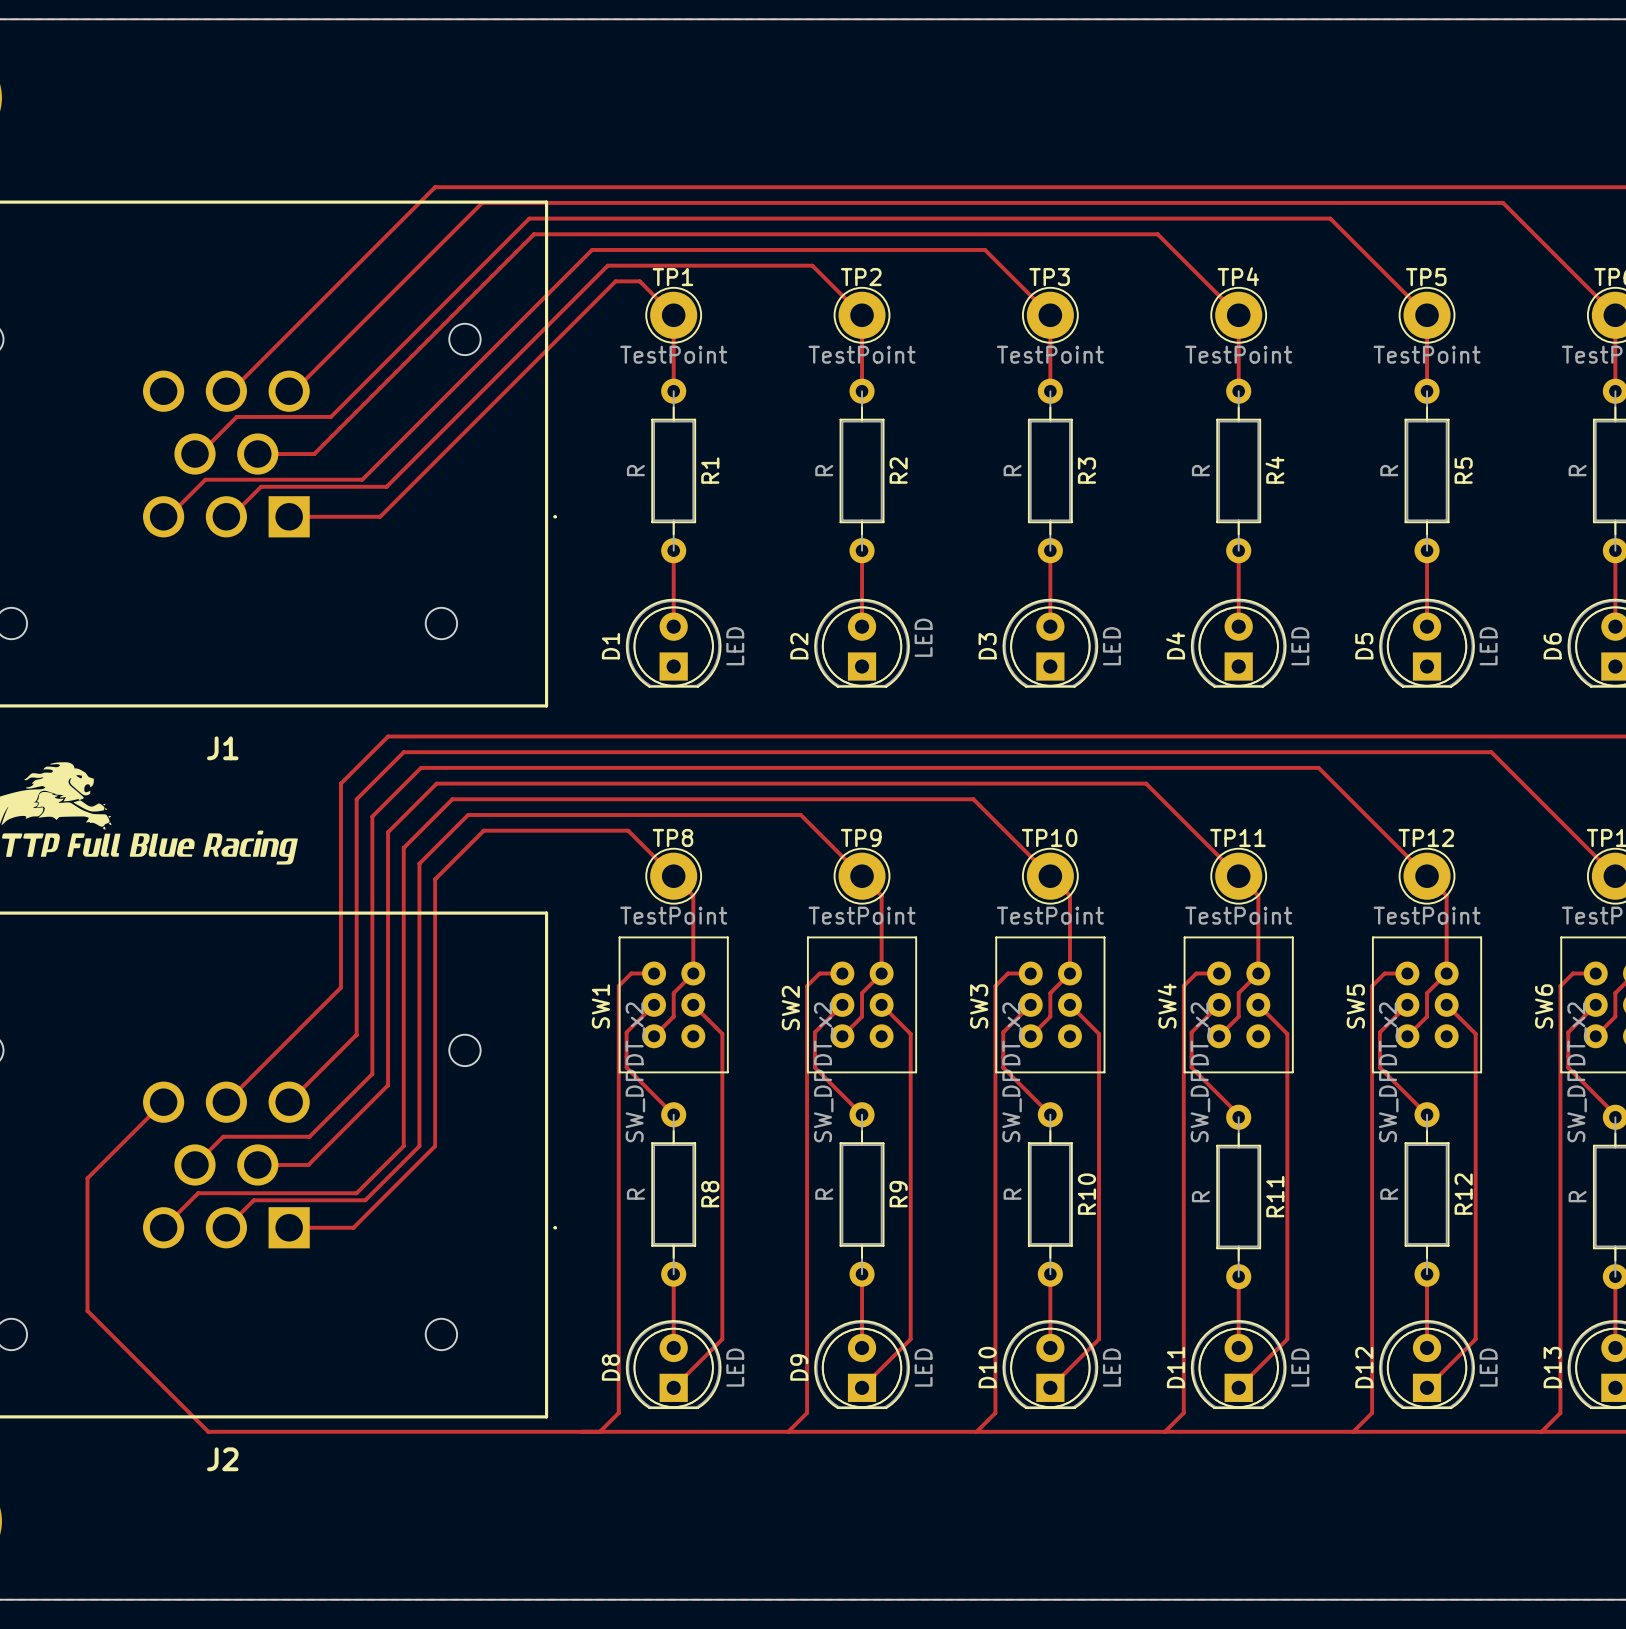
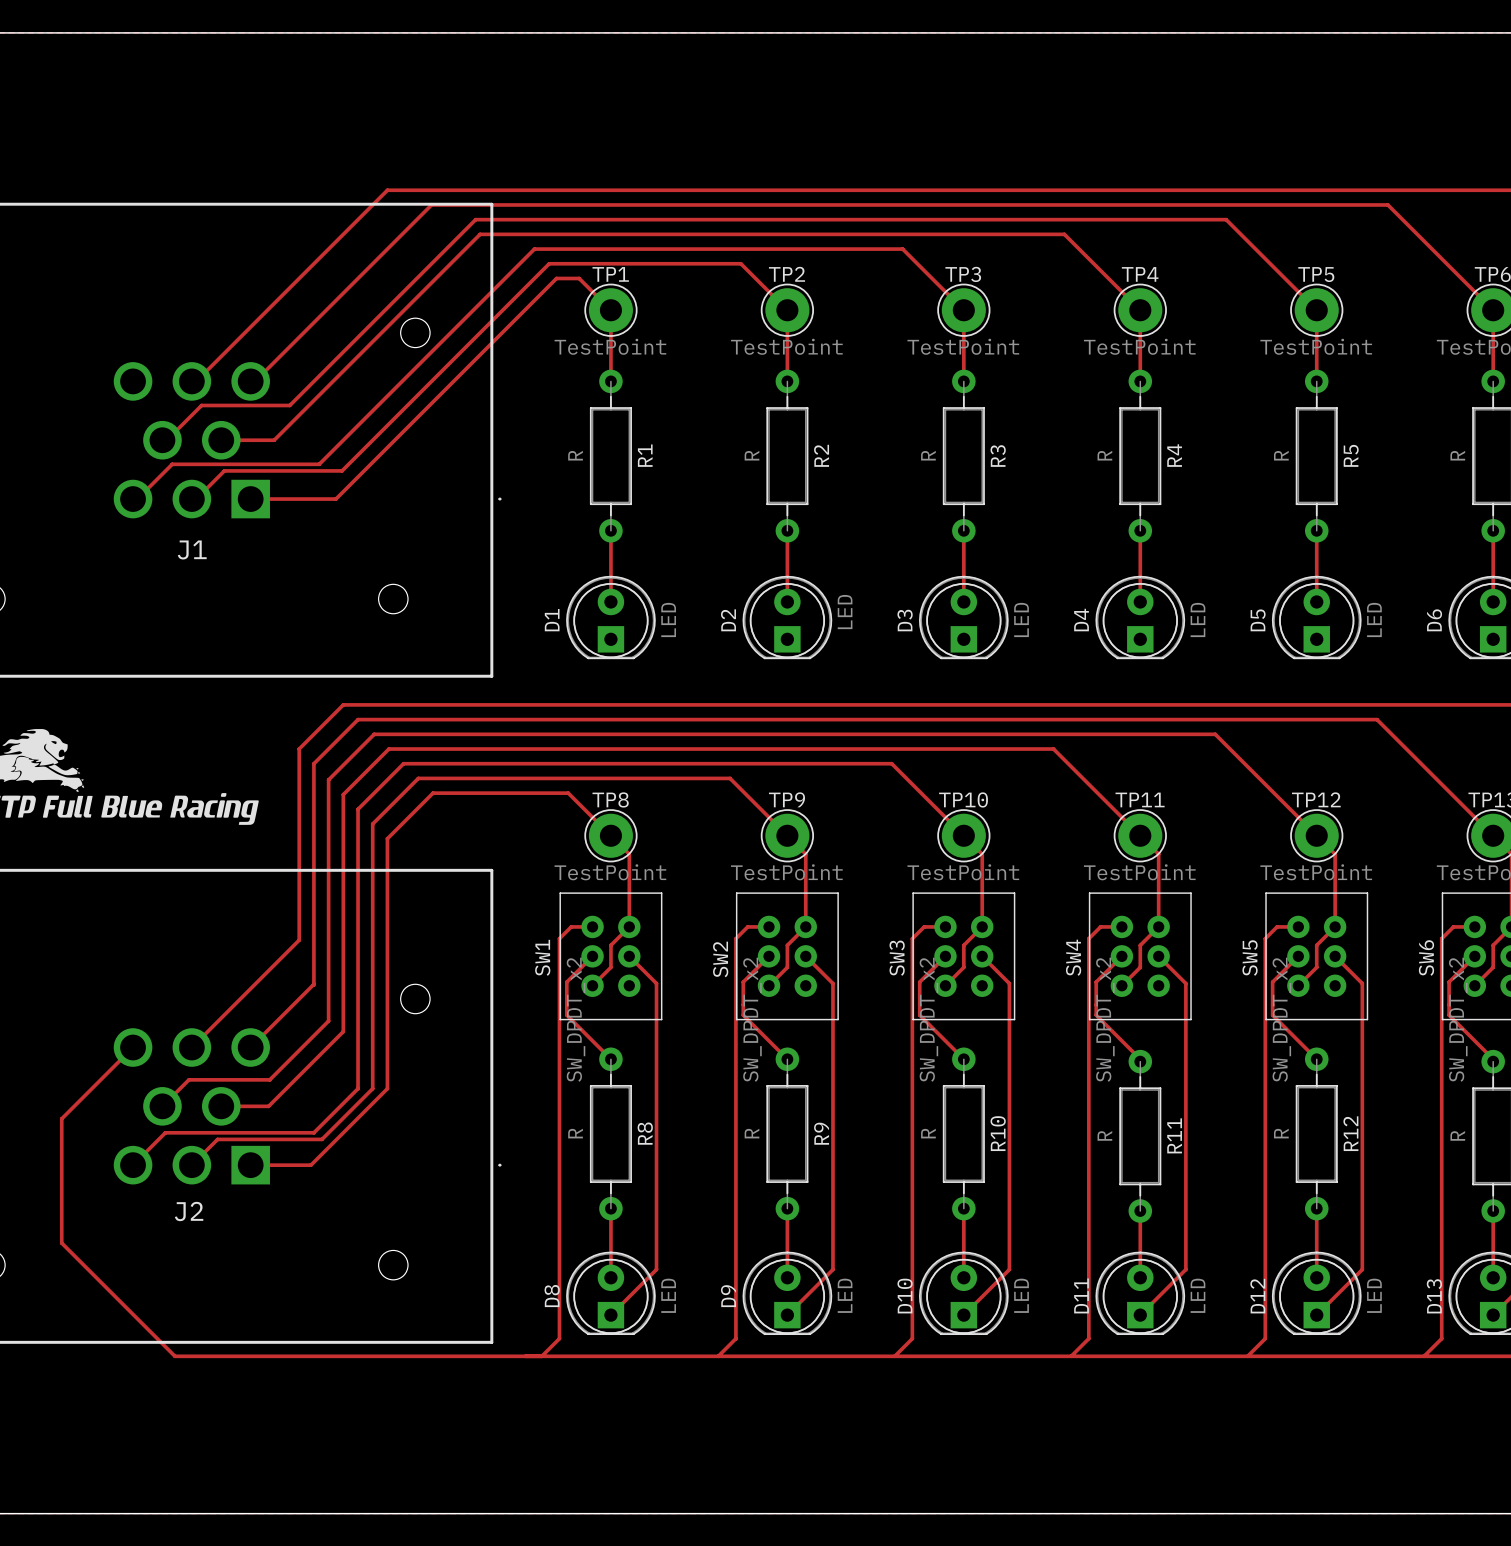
J1 name position: J1 (222, 748) -> J1 (192, 549)
J2 name position: J2 (222, 1459) -> J2 (189, 1211)

